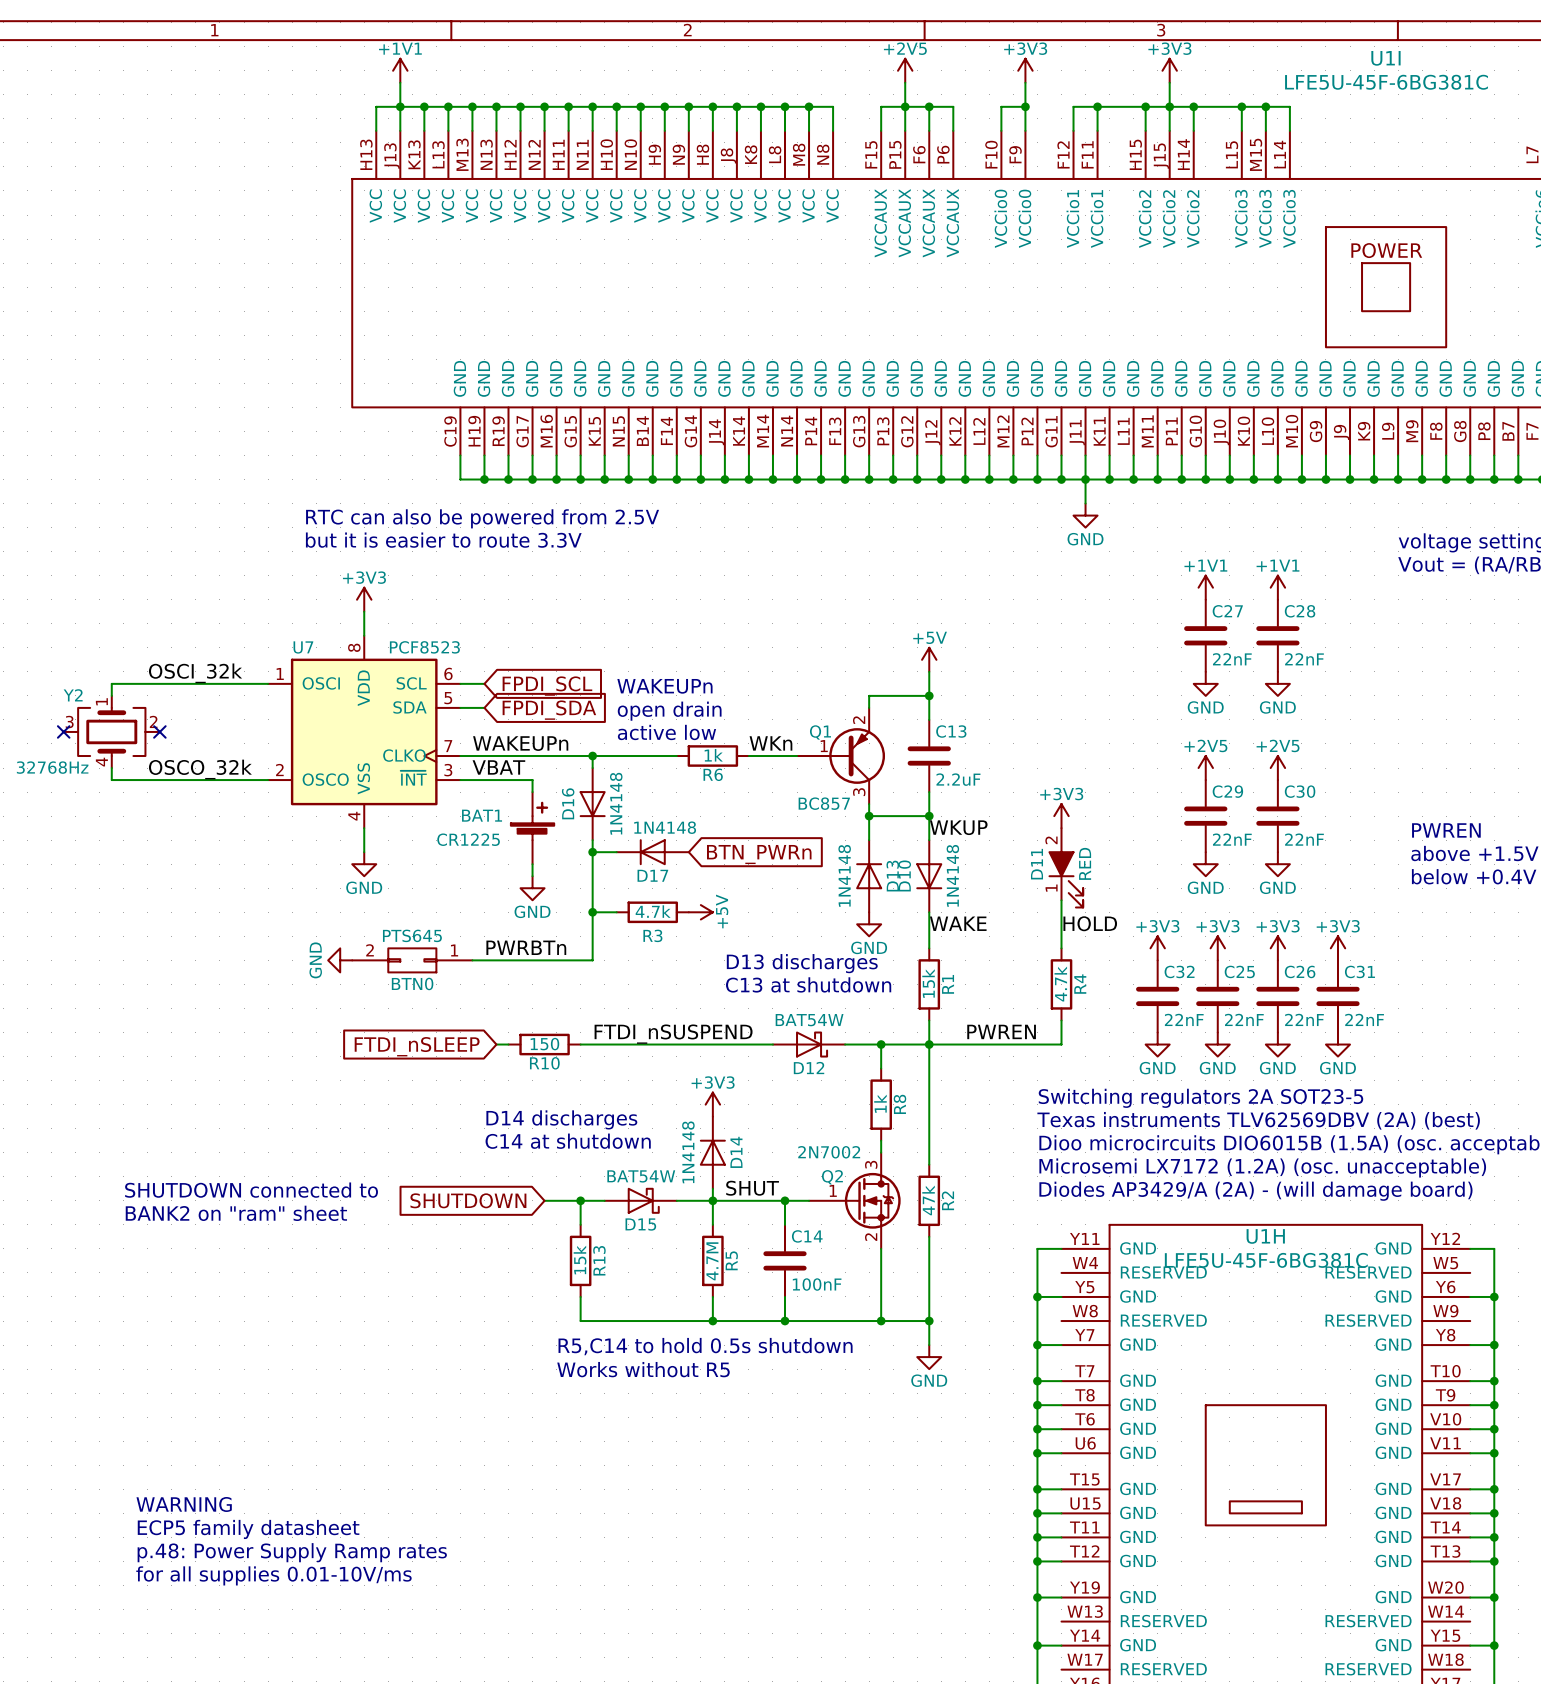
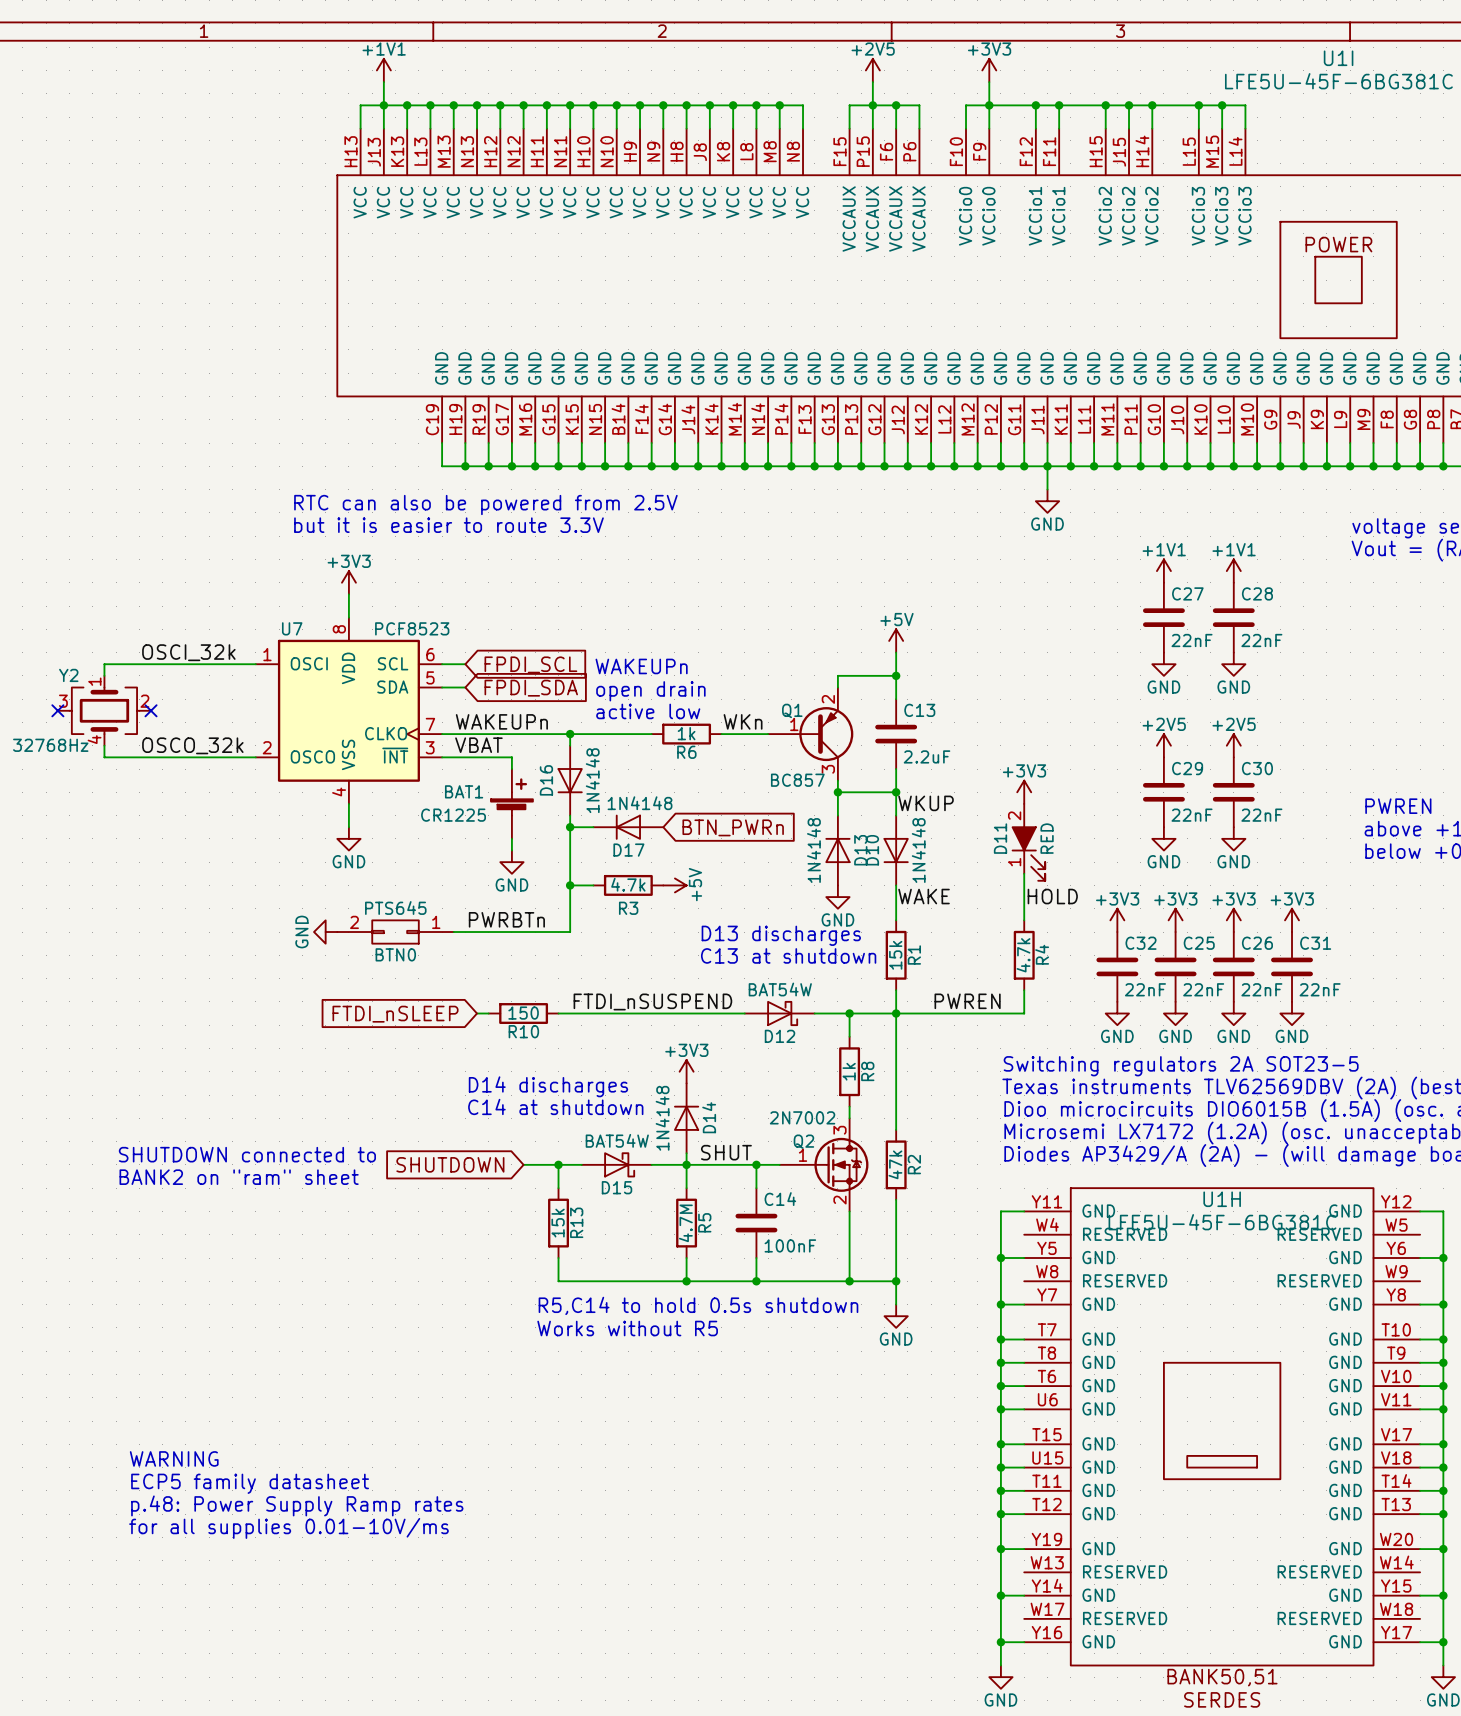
power symbol: +3V3 (1169, 70) -> none
wire: (1169, 82) (1169, 106) -> none
wire: none -> (989, 105) (1035, 105)
junction: none -> (1035, 105)

